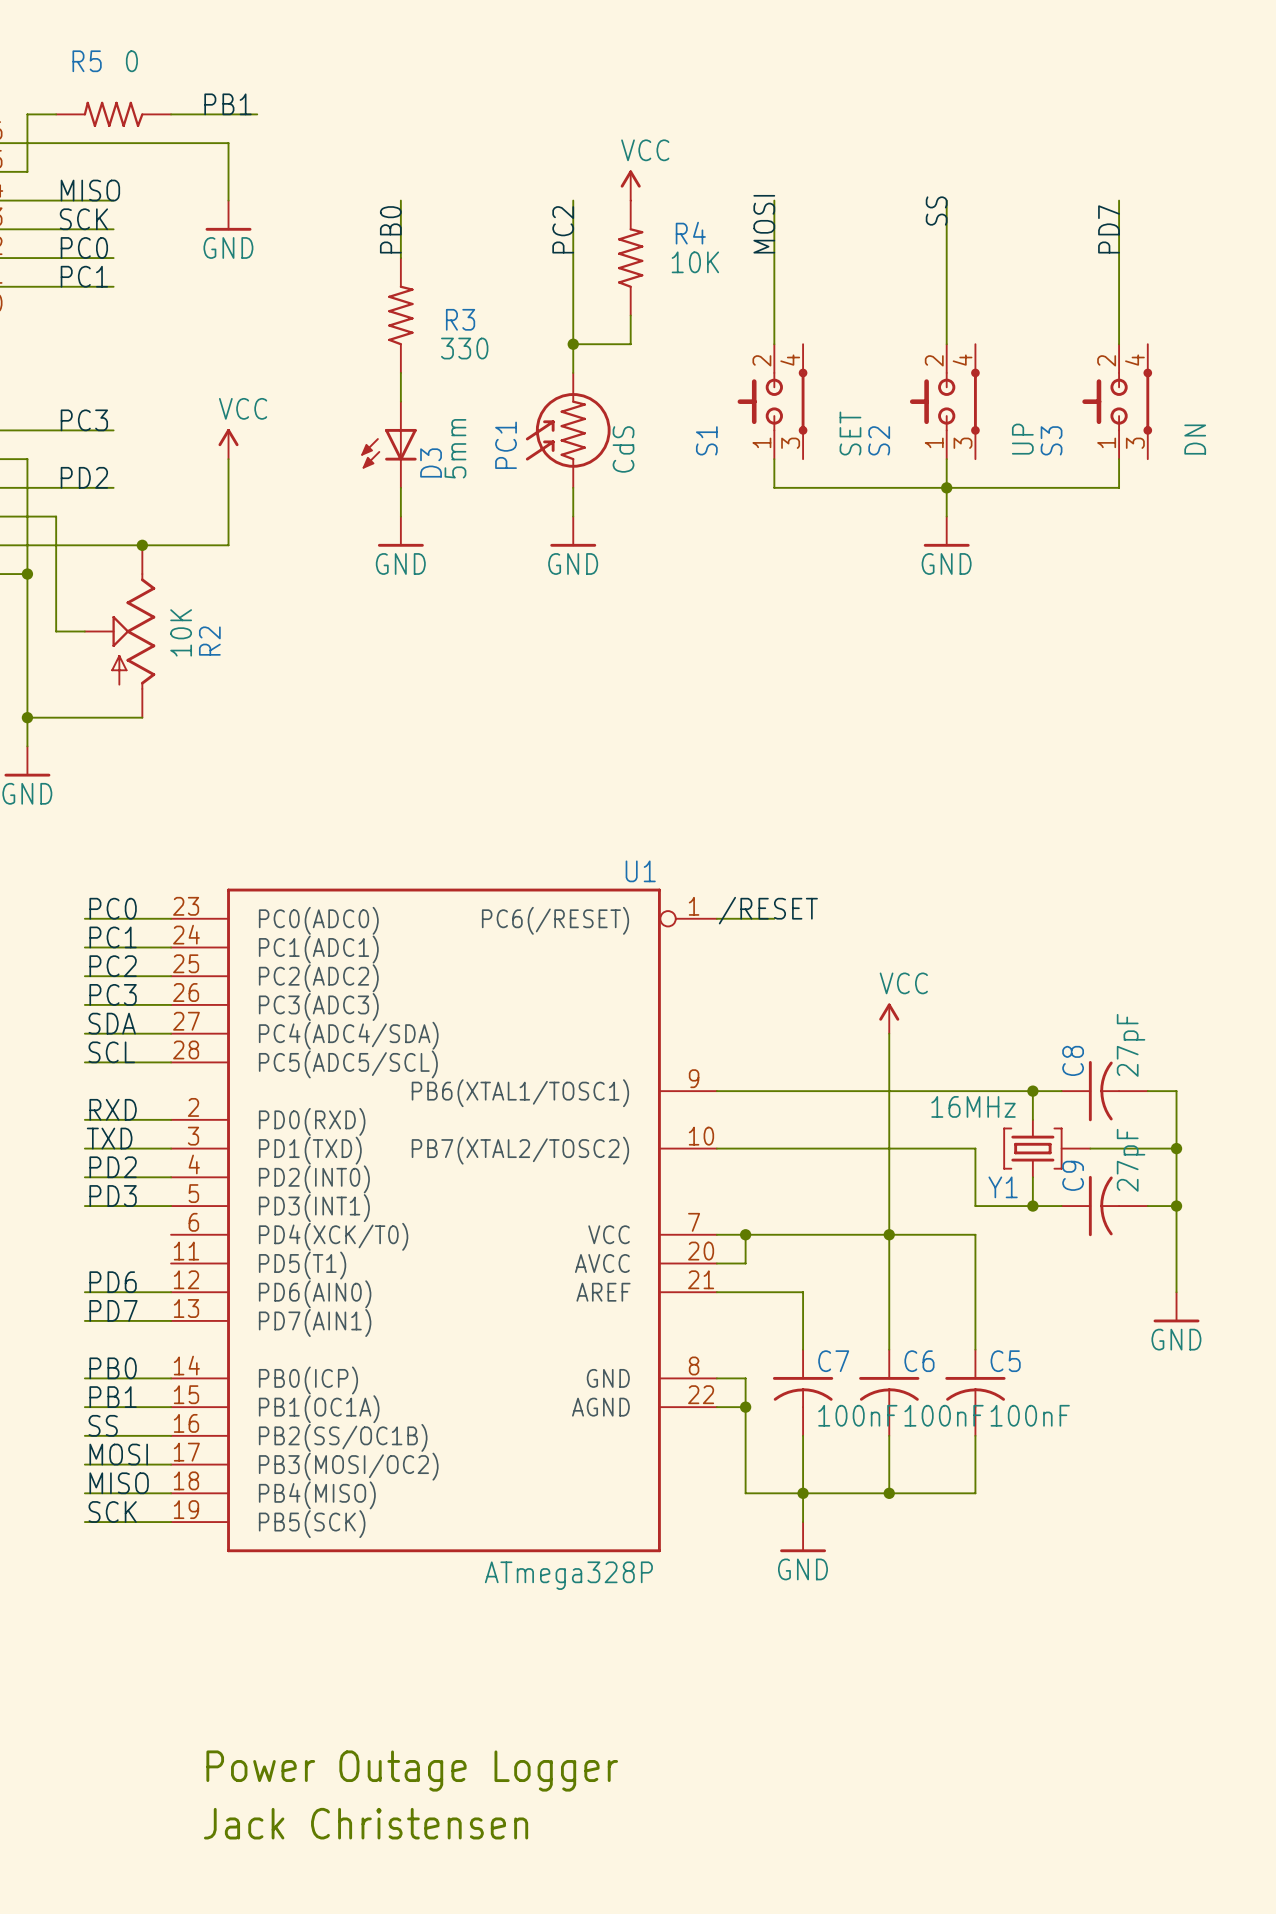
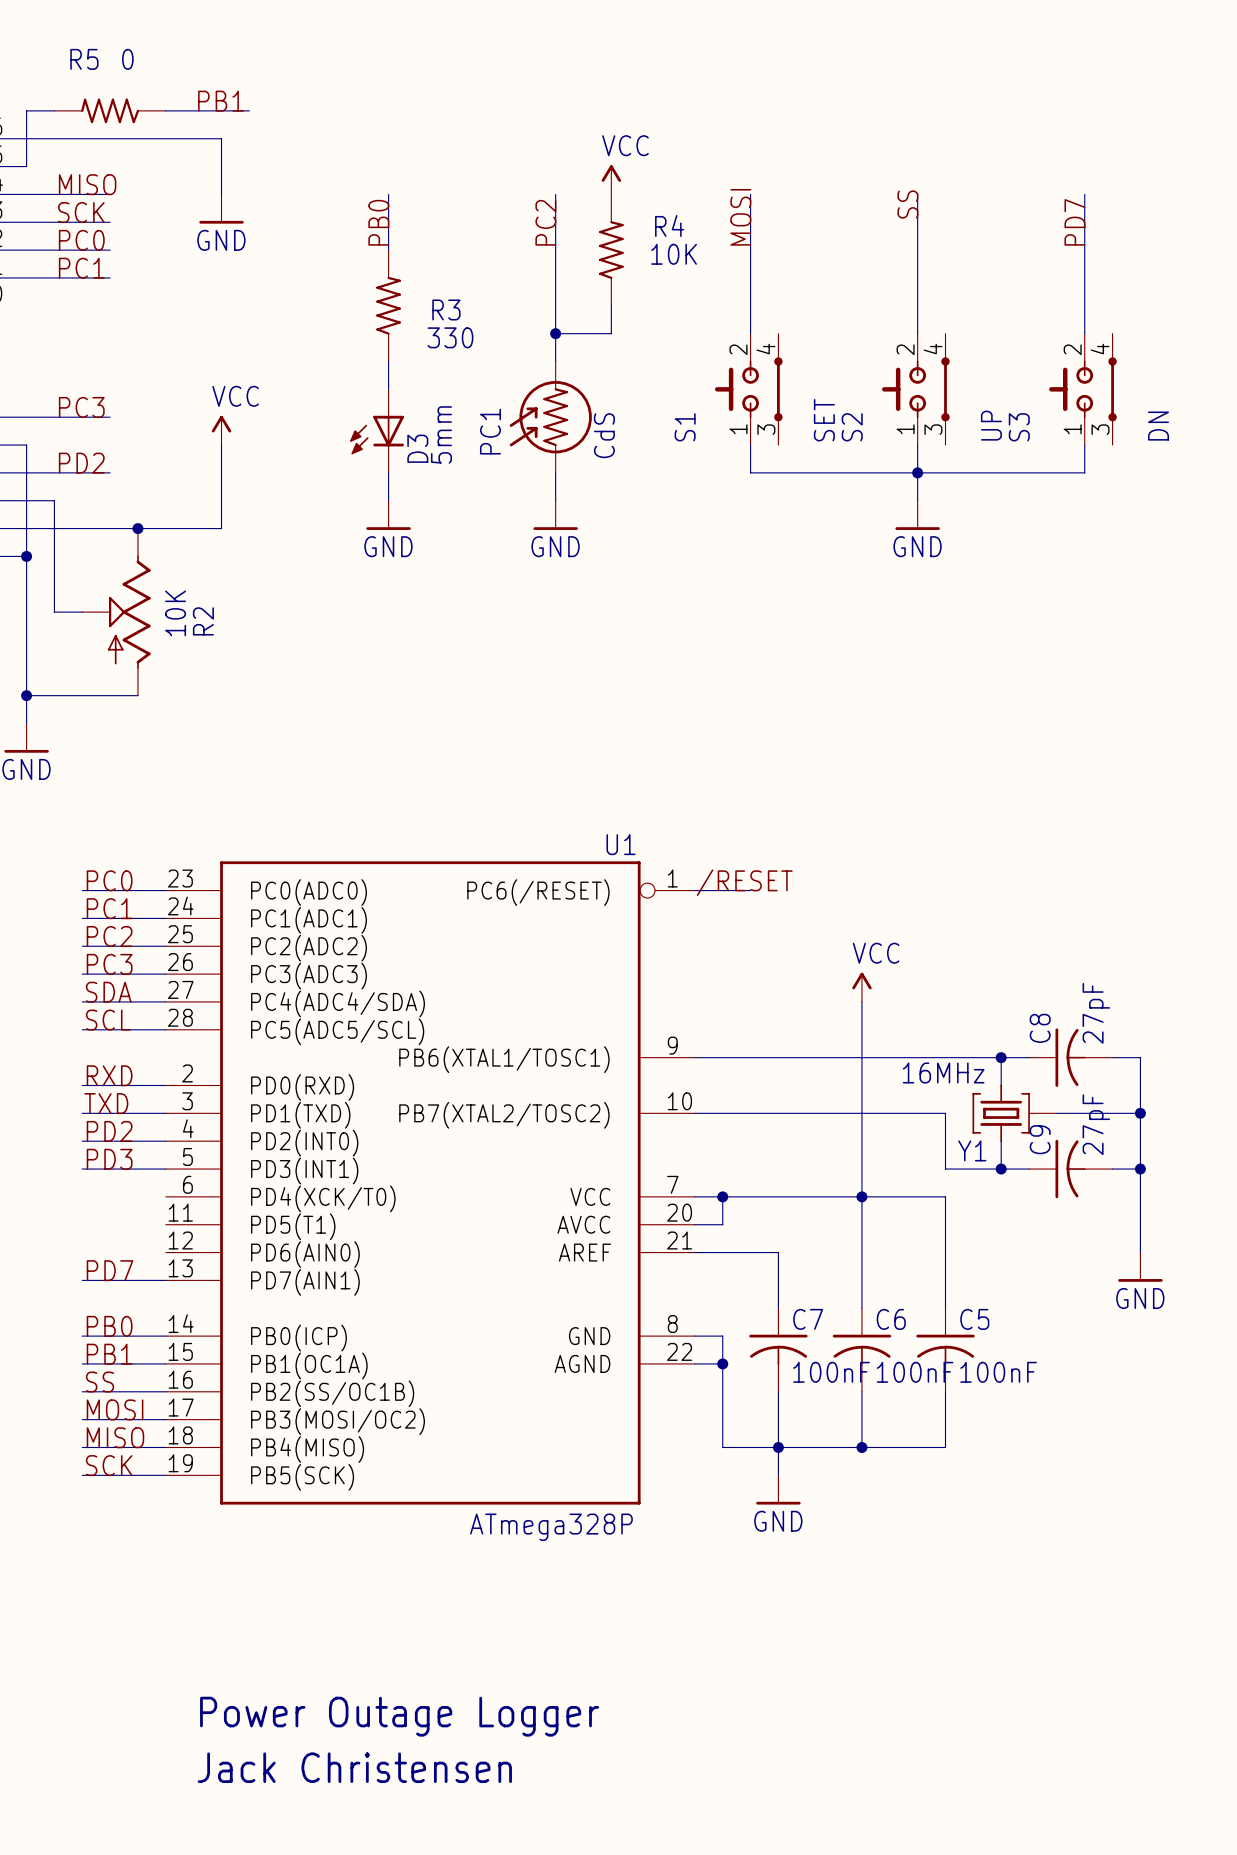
label: PD6 (113, 1282) -> none
wire: (84, 1292) (171, 1292) -> none

